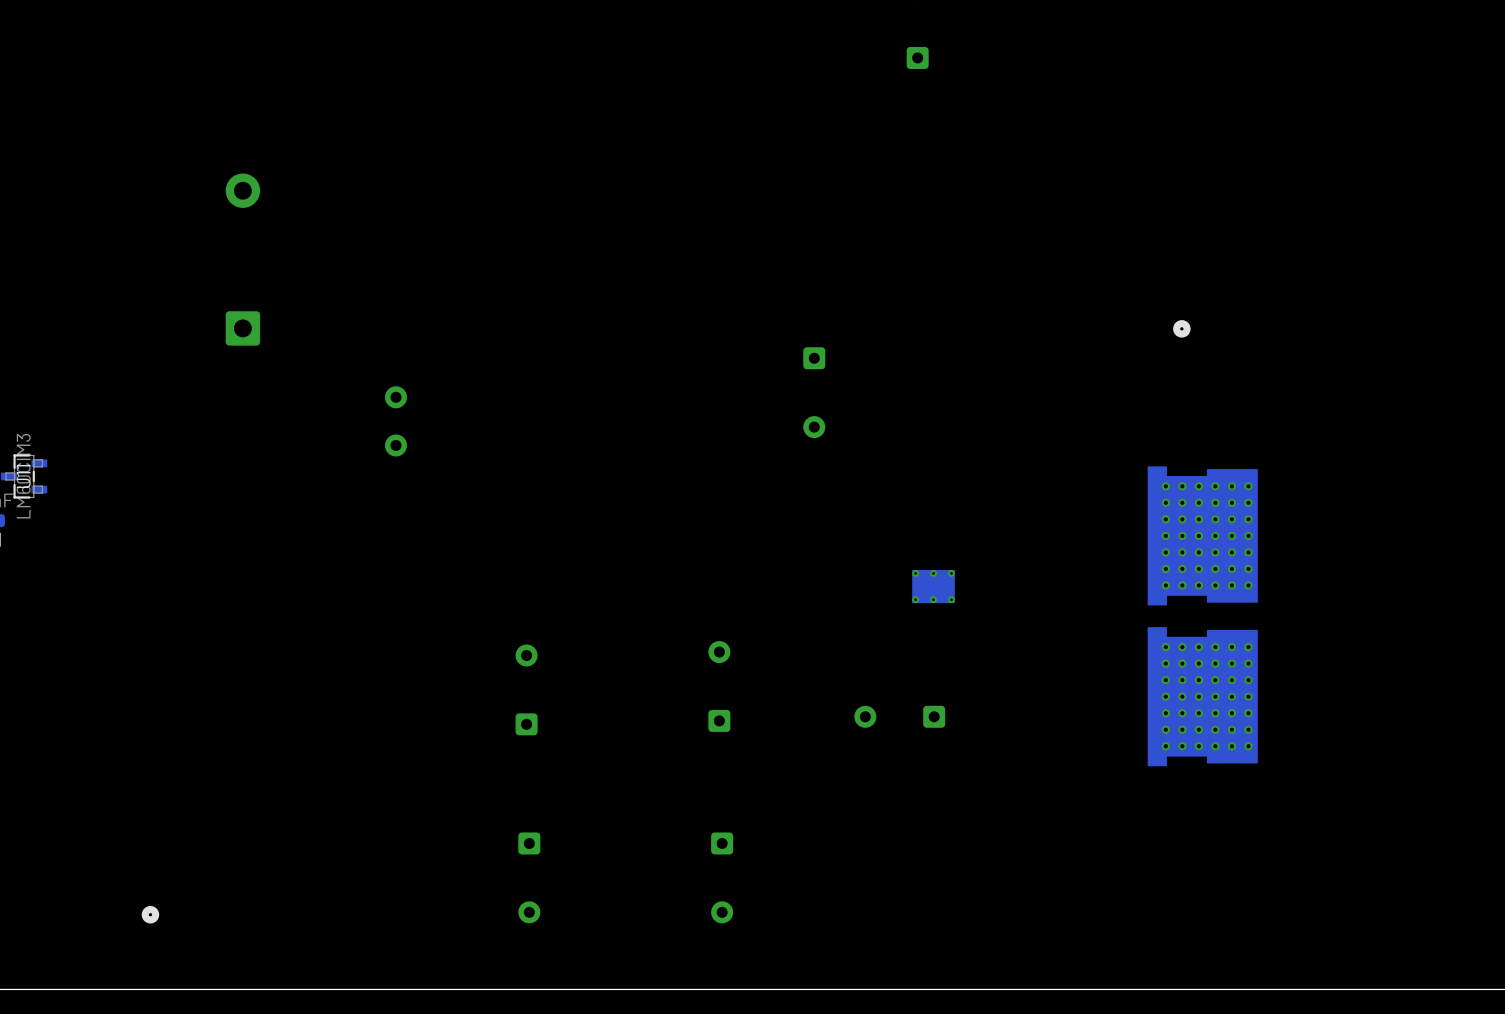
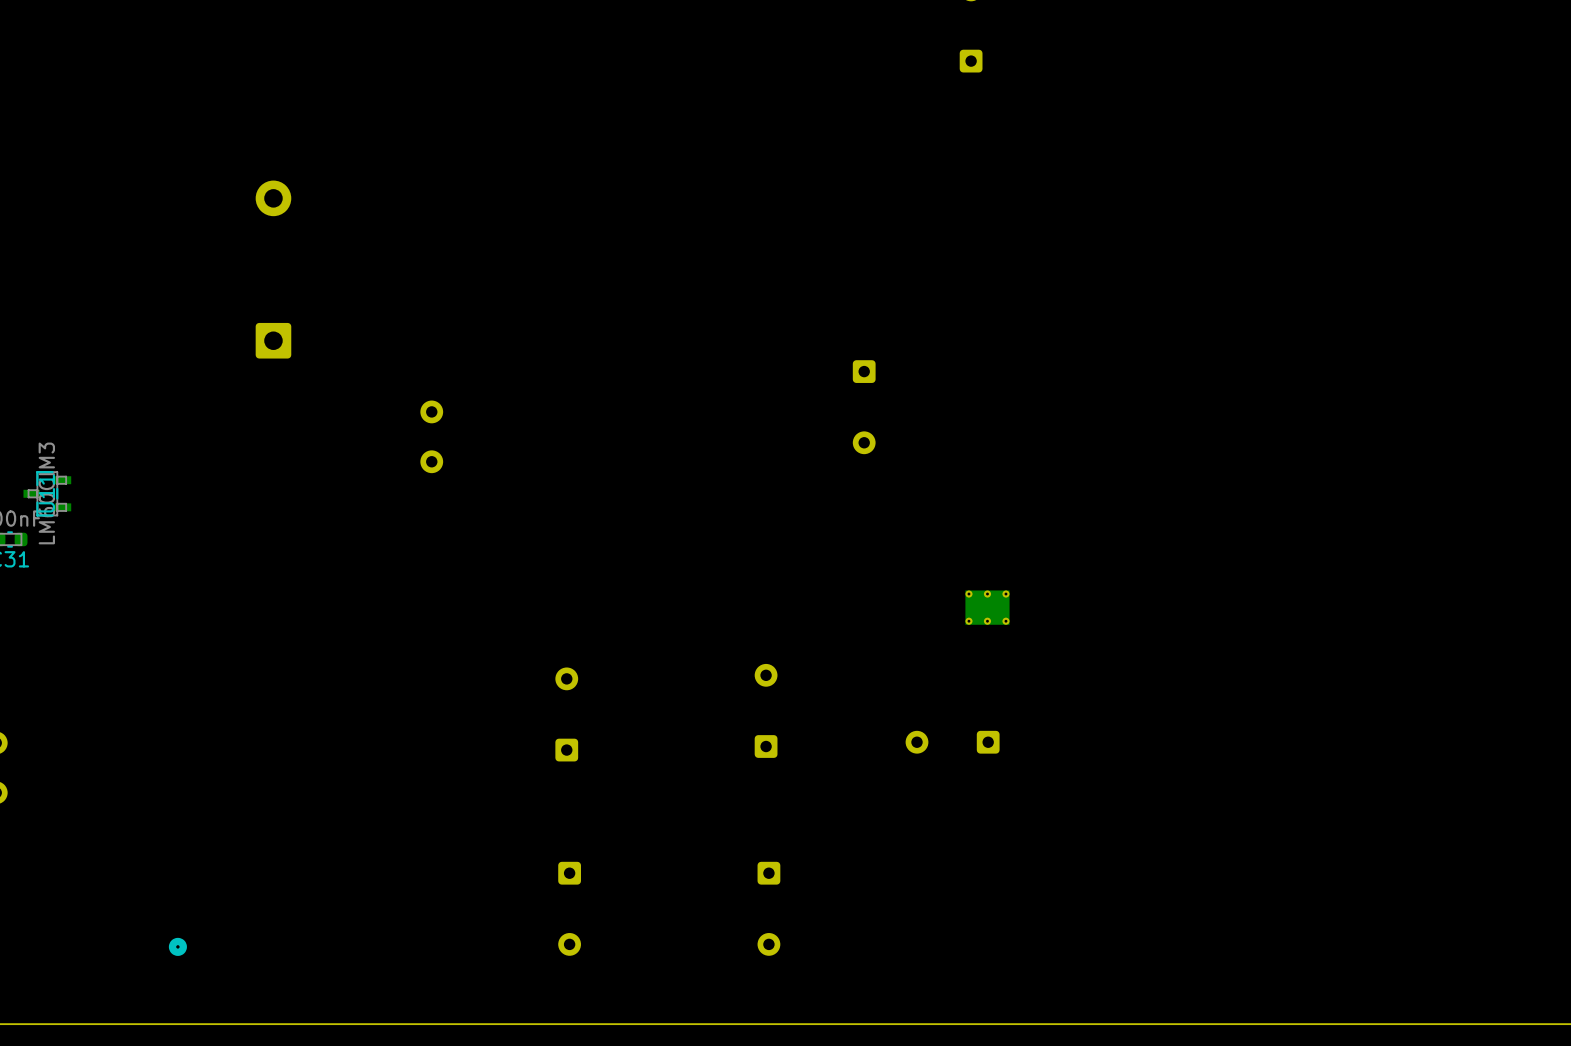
part: (1181, 328) -> none
part: (1202, 535) -> none
part: (1202, 696) -> none

